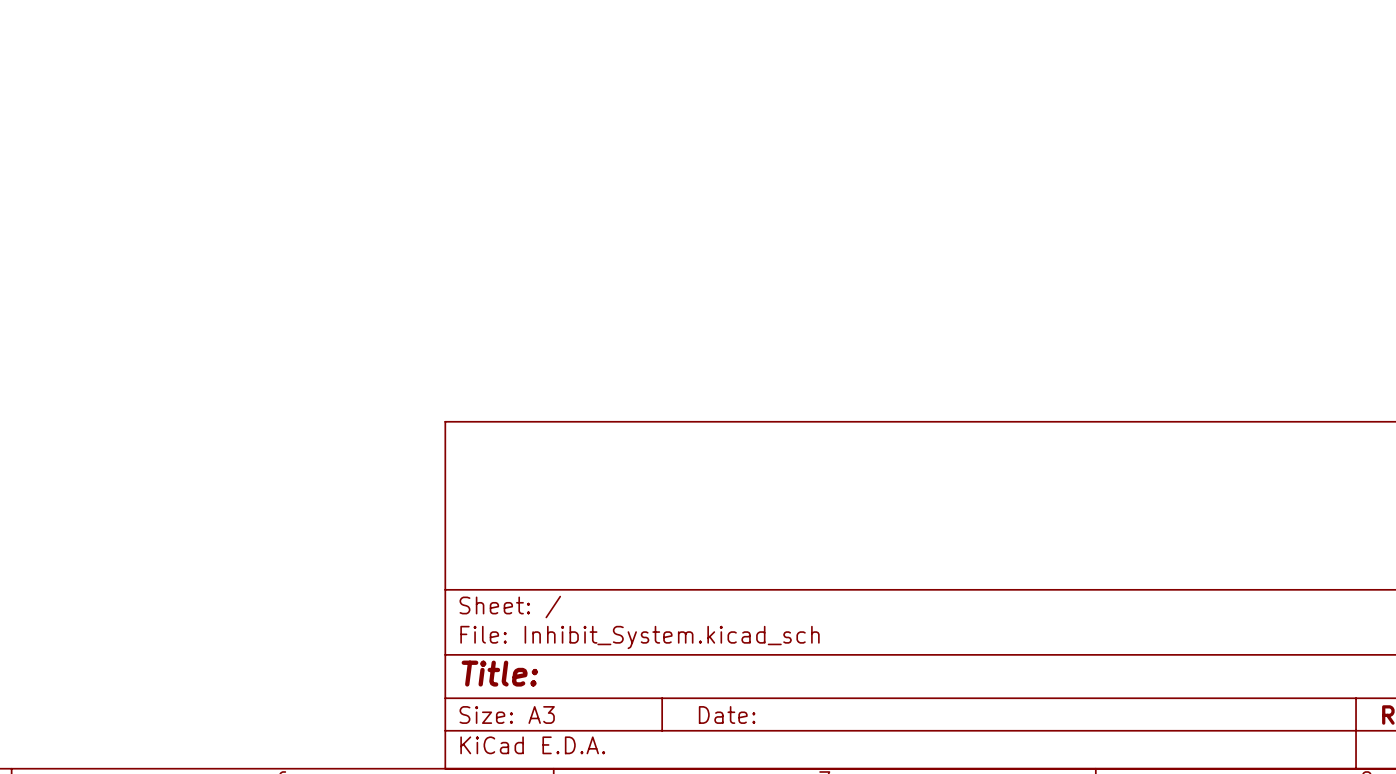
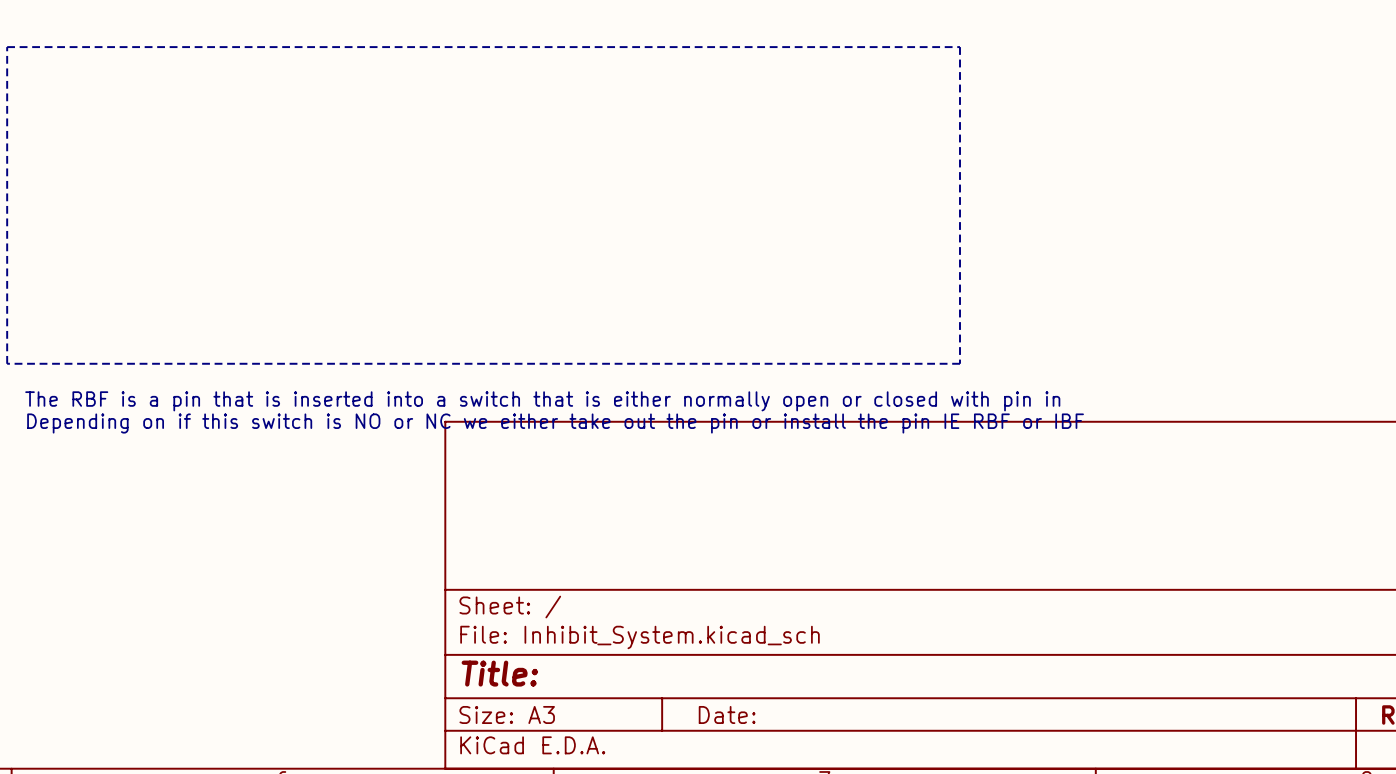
line: none -> (7, 47) (959, 47) (959, 363) (7, 363) (7, 47)
text: none -> The RBF is a pin that is inserted into a switch that is either normally open or closed with pin in (542, 401)
text: none -> Depending on if this switch is NO or NC we either take out the pin or install the pin IE RBF or IBF (555, 423)

